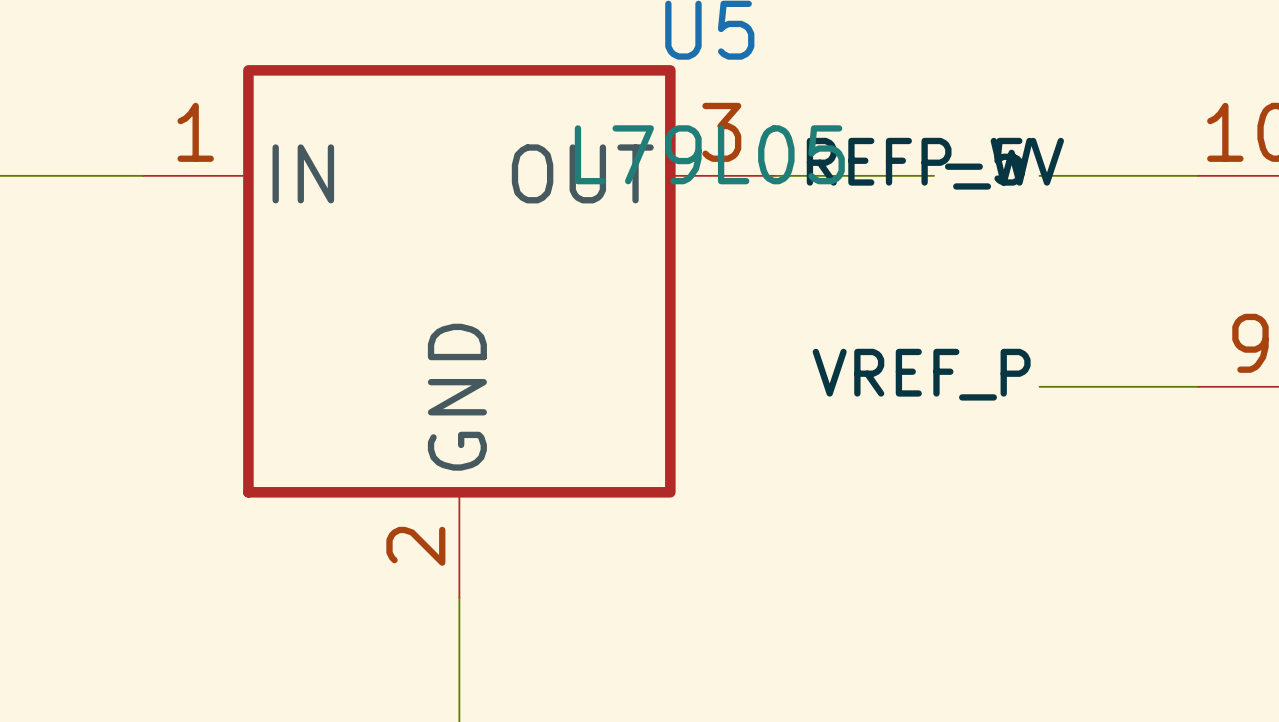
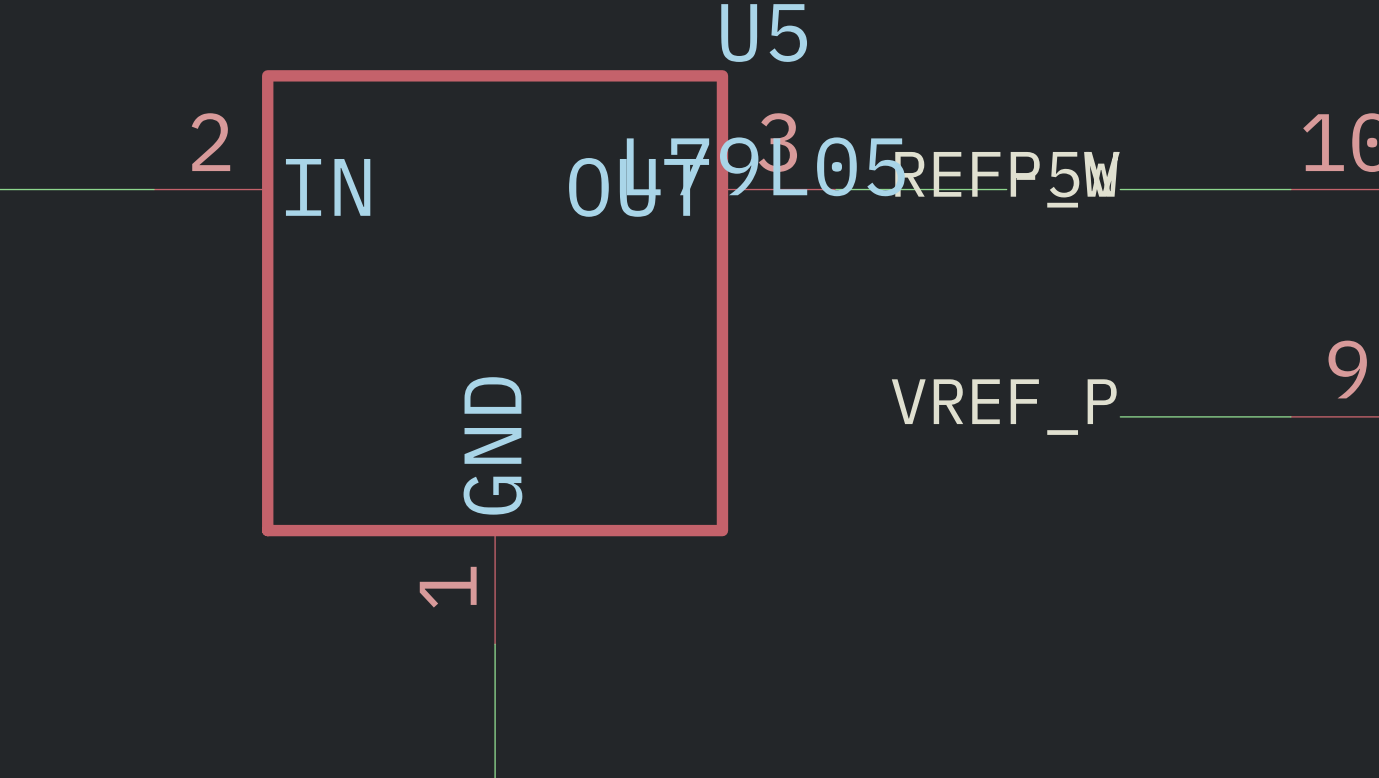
U5 pin number: 1 (195, 132) -> 2 (210, 142)
U5 pin number: 2 (415, 546) -> 1 (448, 587)

